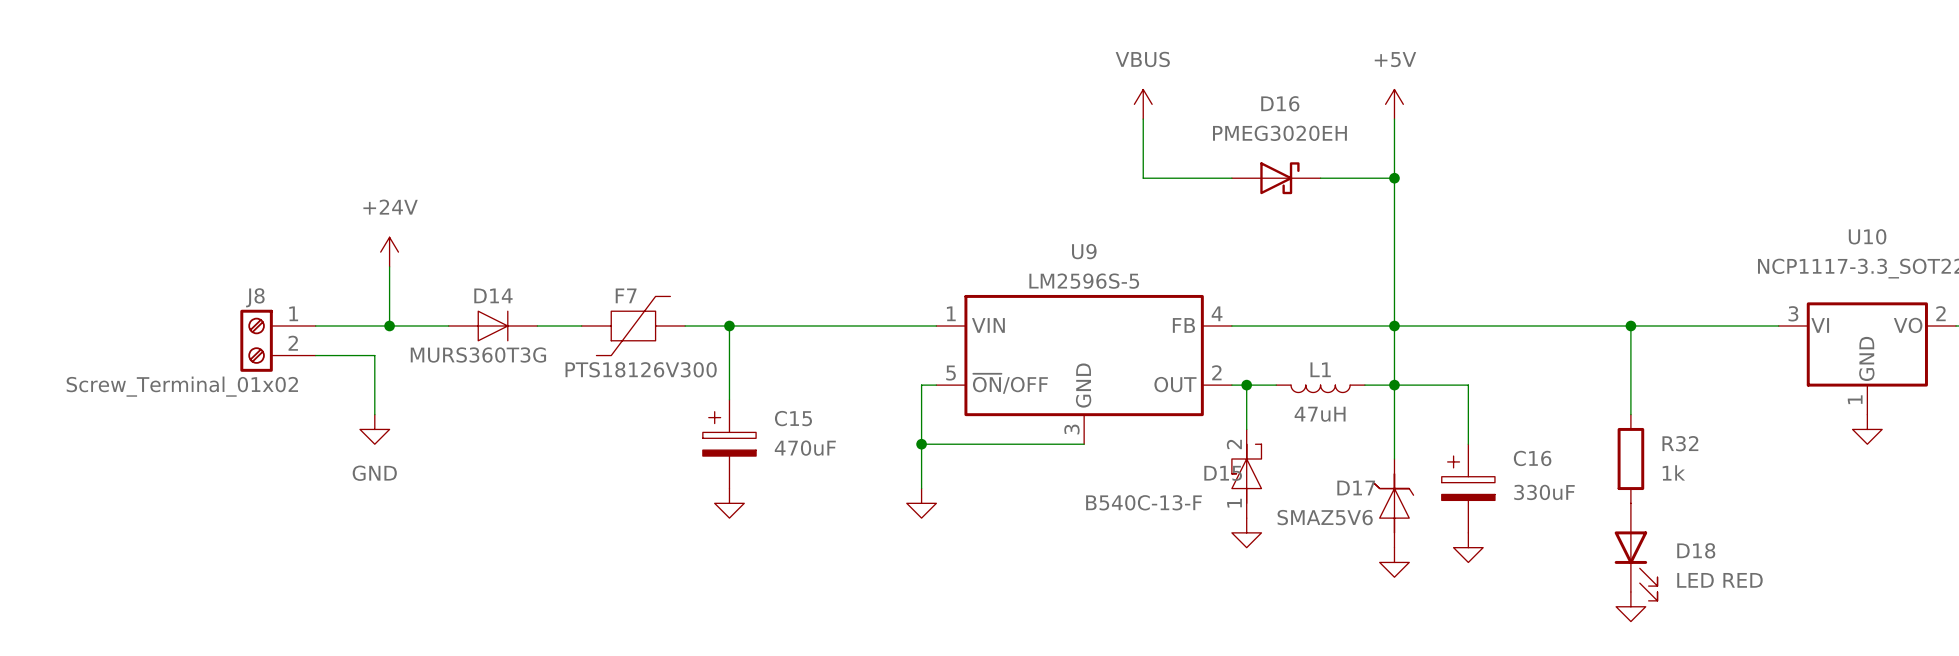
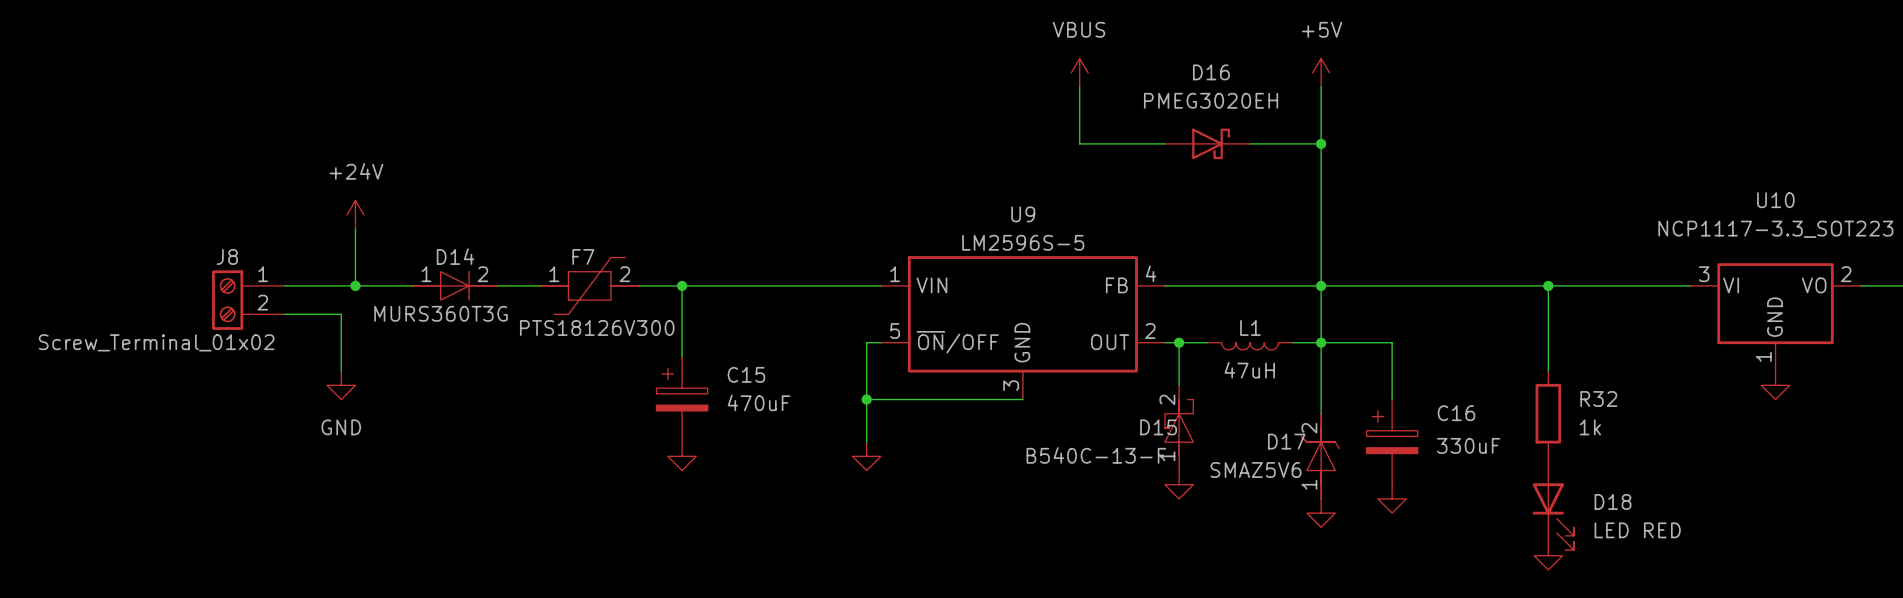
F7 symbol: [581, 296, 686, 356] -> [540, 257, 640, 315]
D14 symbol: [448, 311, 538, 341] -> [412, 271, 498, 301]
D17 symbol: [1374, 459, 1414, 548] -> [1301, 413, 1340, 499]

